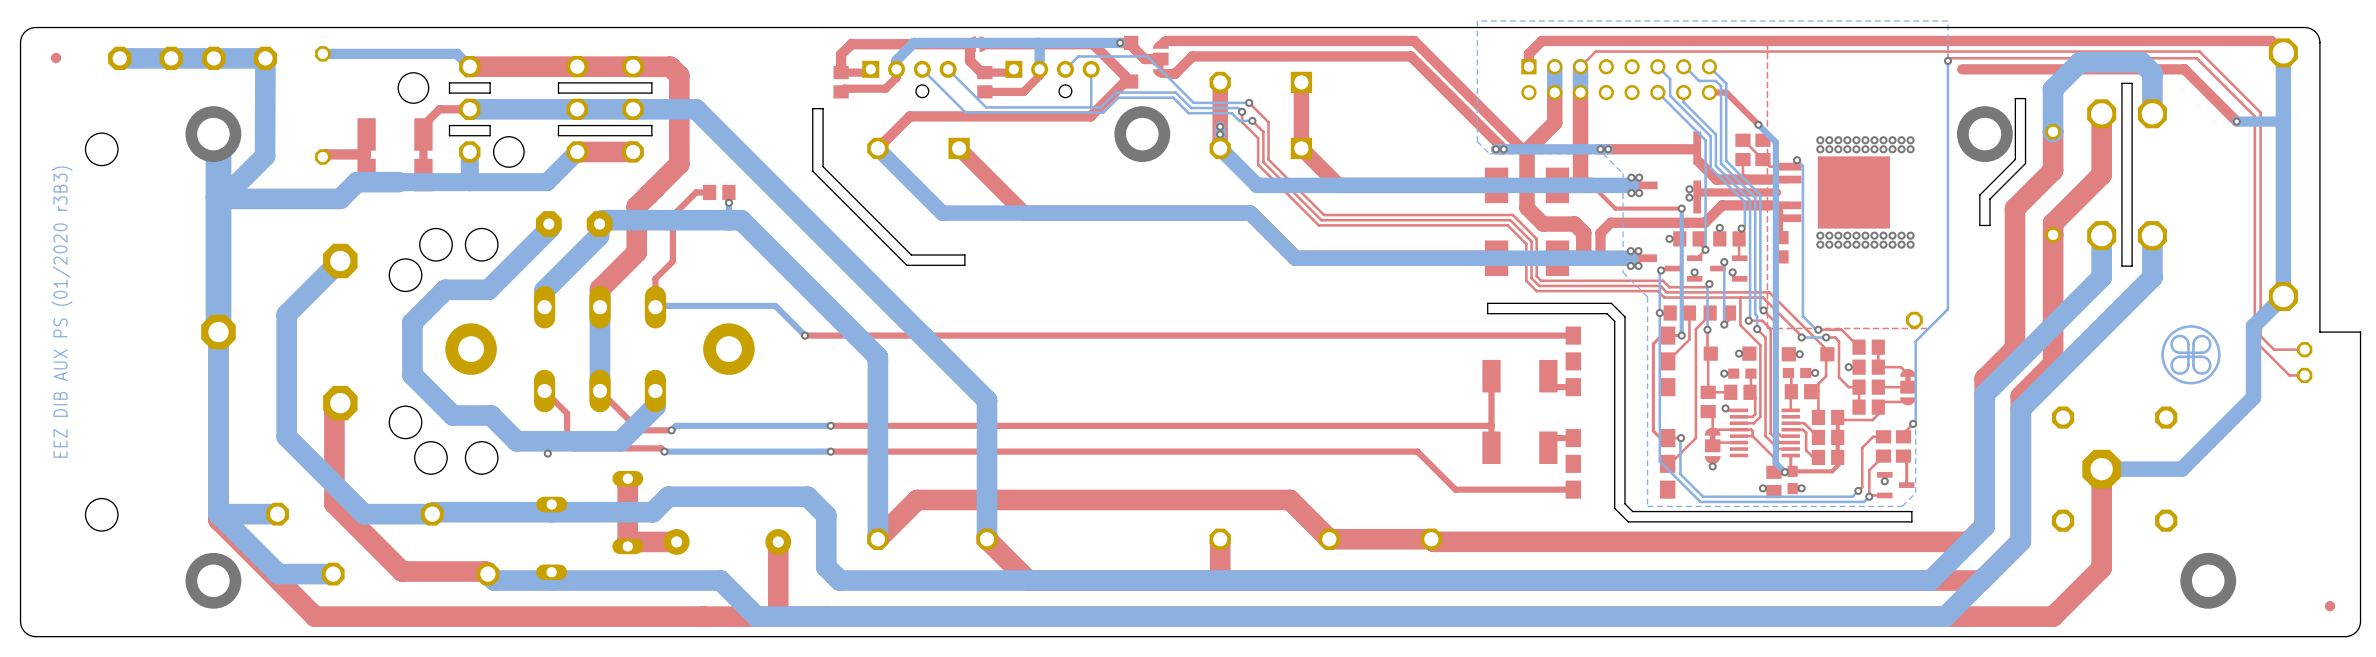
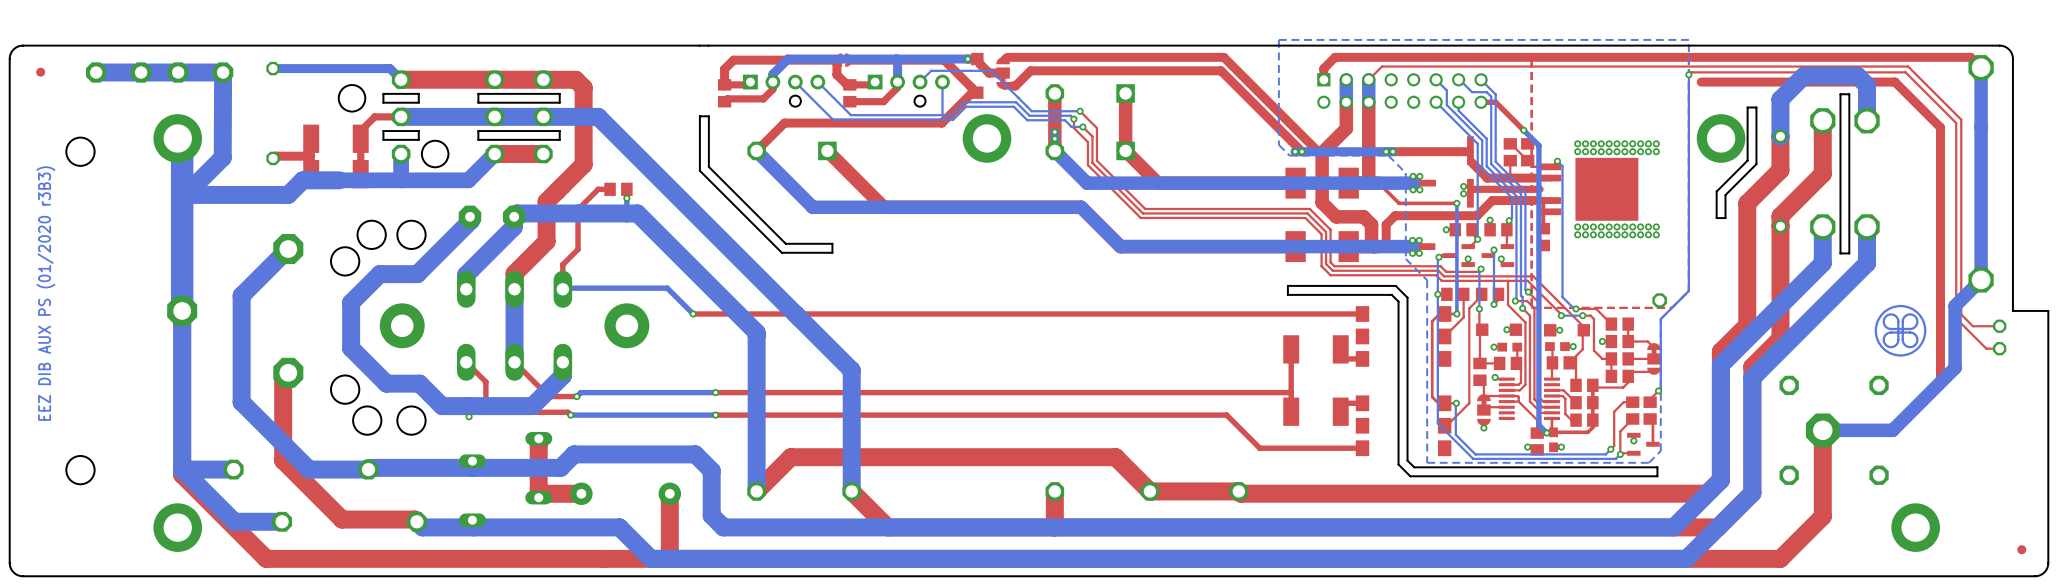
top track: none -> (1940, 127) (1940, 381) (1892, 430) (1822, 430)
via: (2236, 121) -> none
bottom track: (2282, 121) (2236, 121) -> none

